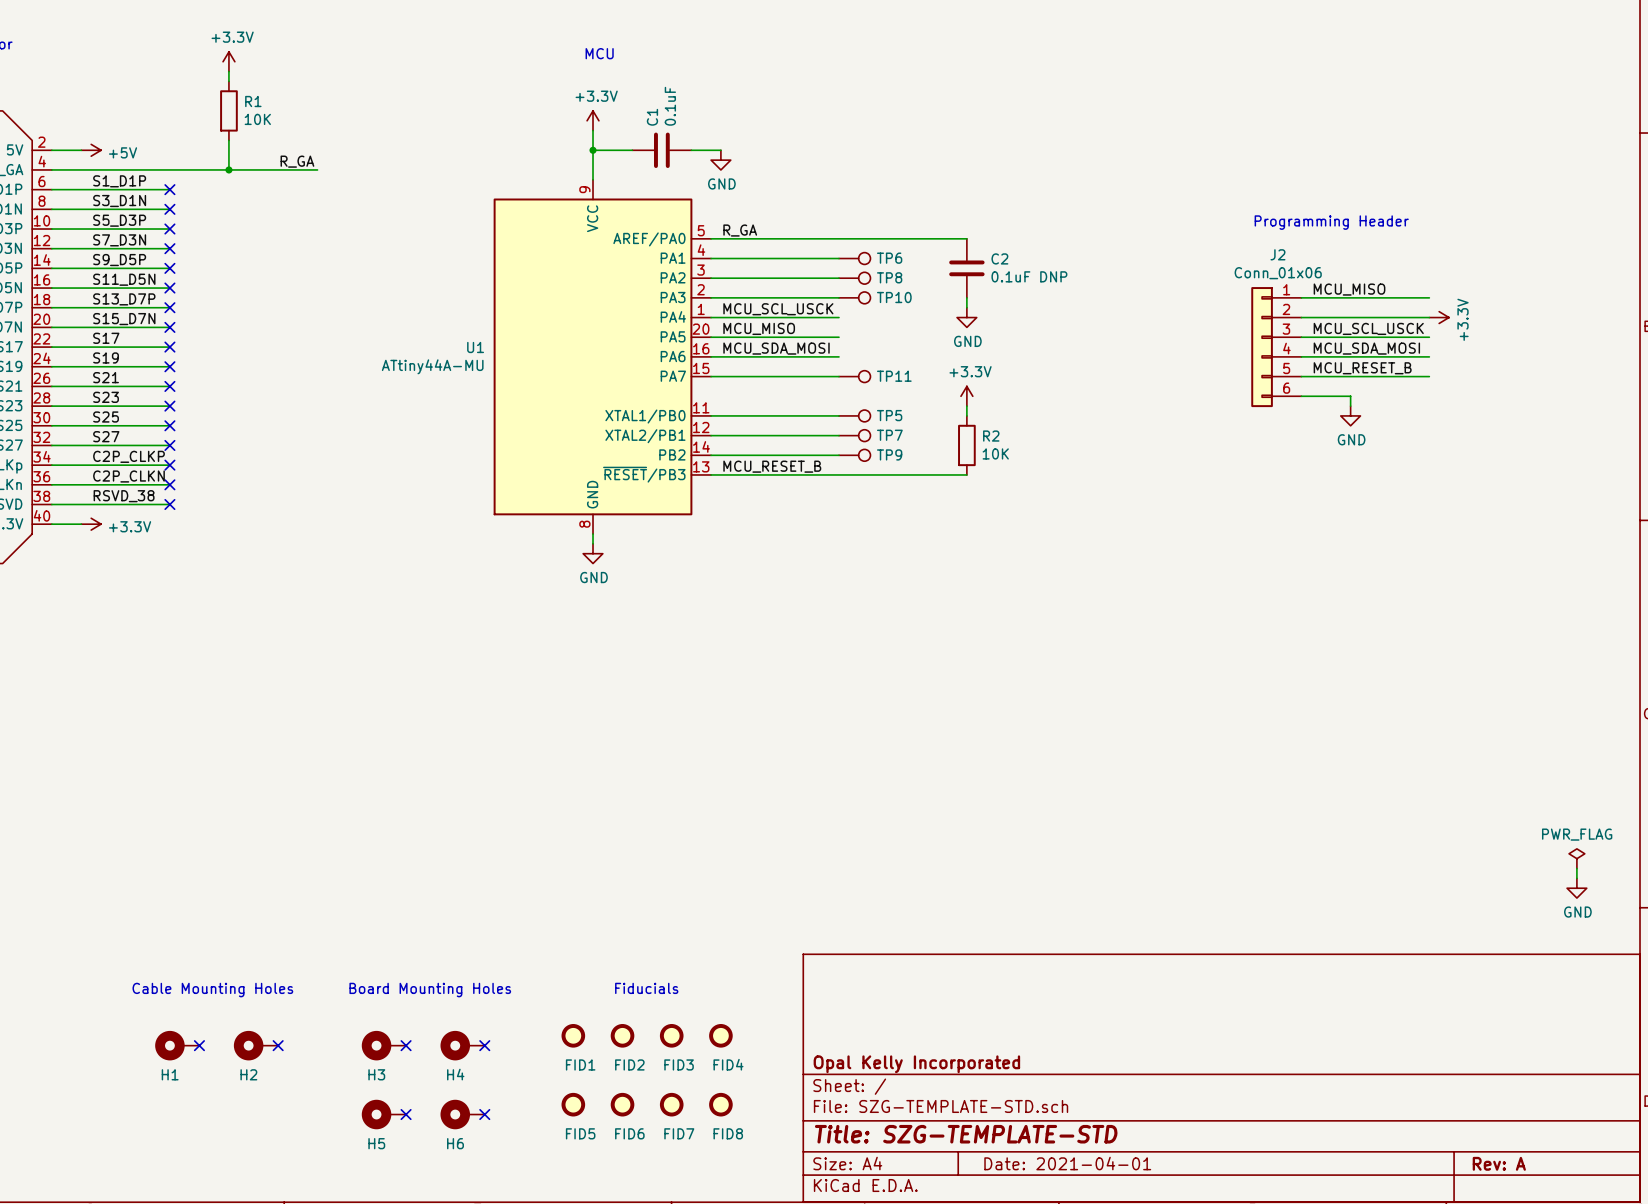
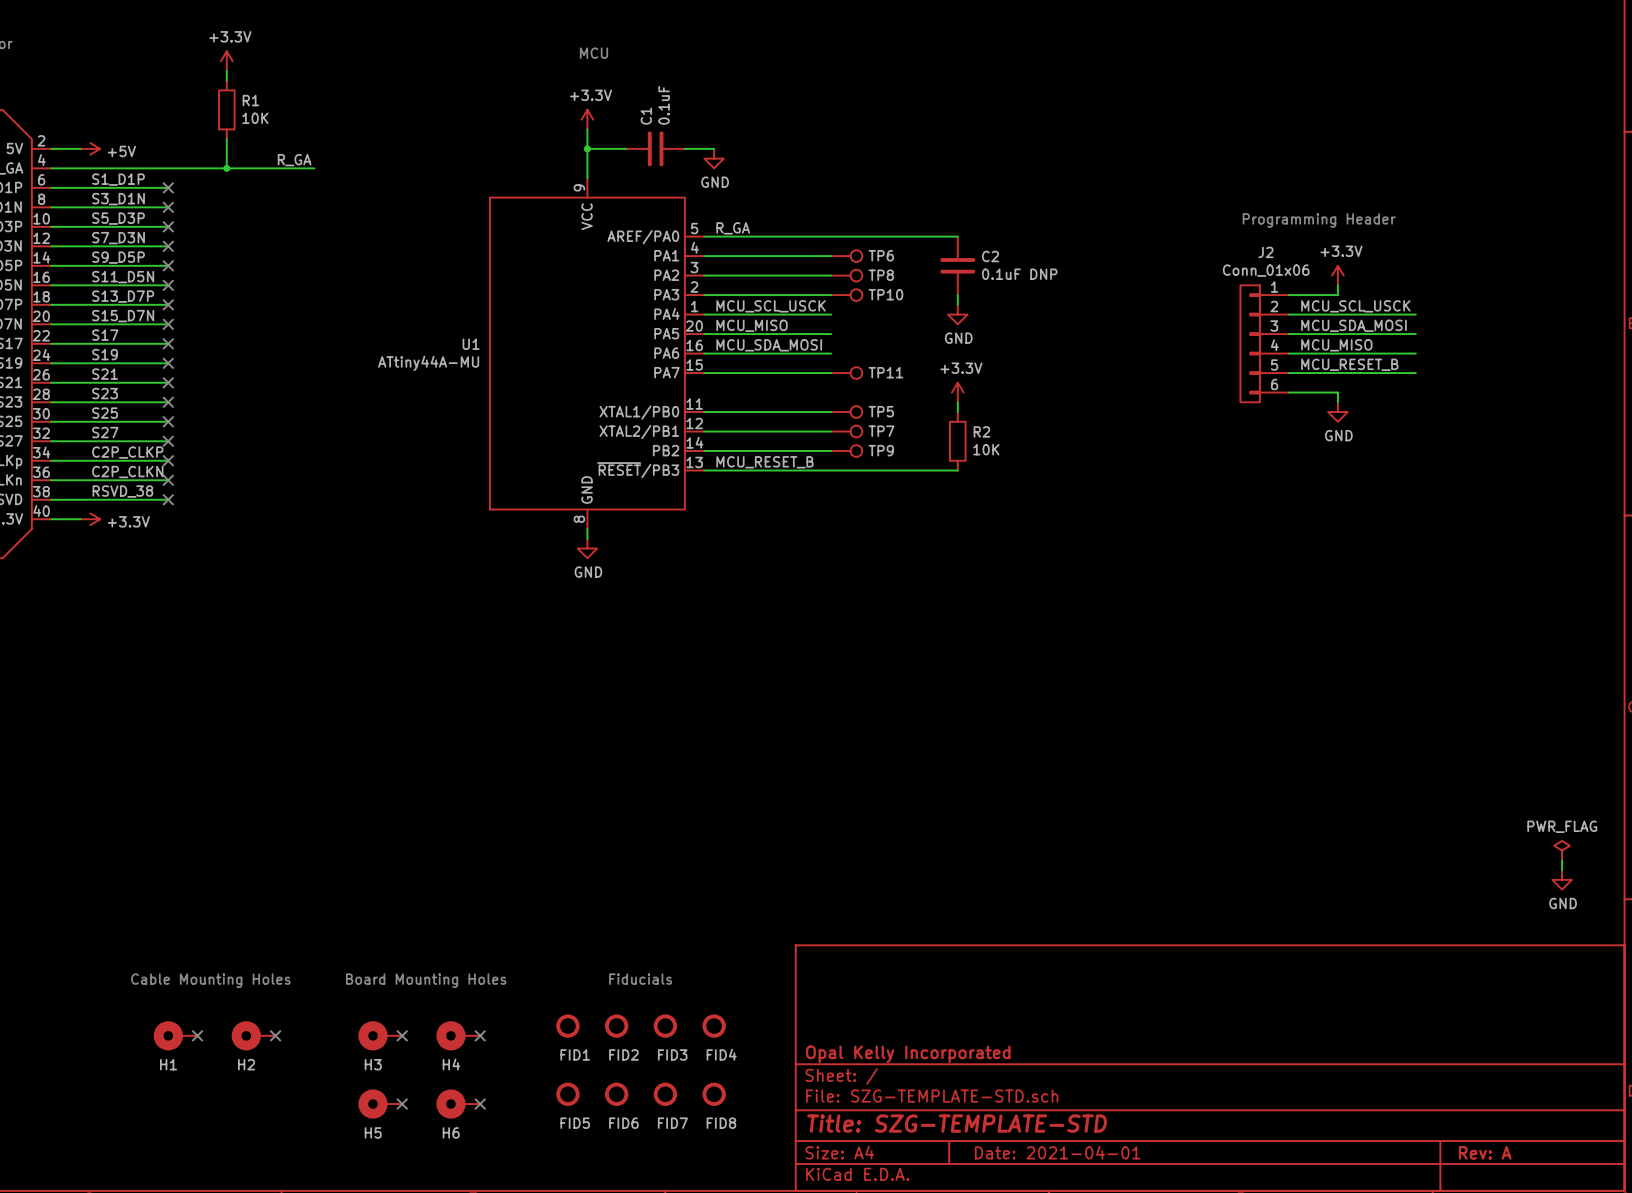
label: MCU_MISO (1349, 289) -> none
wire: (1350, 297) (1429, 297) -> (1337, 295) (1337, 285)
label: none -> MCU_SCL_USCK (1355, 306)
power symbol rotation: 0° (1439, 317) -> 90° counterclockwise (1337, 275)
power symbol position: +3.3V (1439, 317) -> +3.3V (1337, 275)
label: MCU_SCL_USCK (1368, 328) -> MCU_SDA_MOSI (1354, 325)
label: MCU_SDA_MOSI (1366, 348) -> MCU_MISO (1336, 345)

